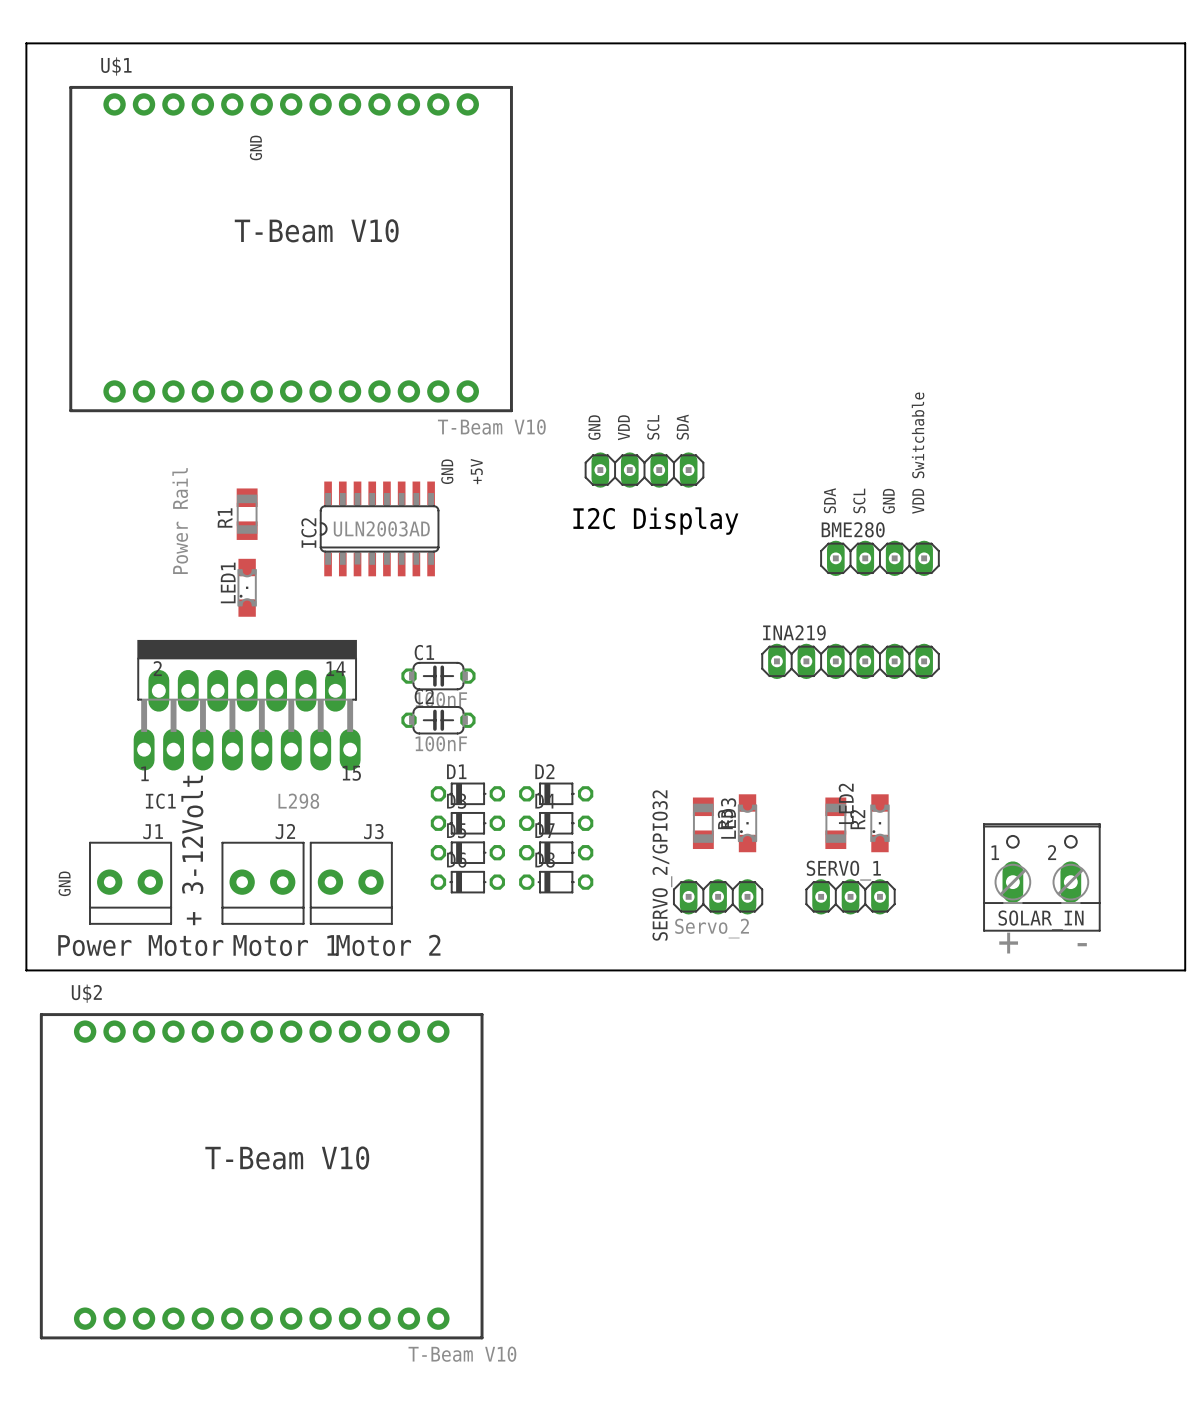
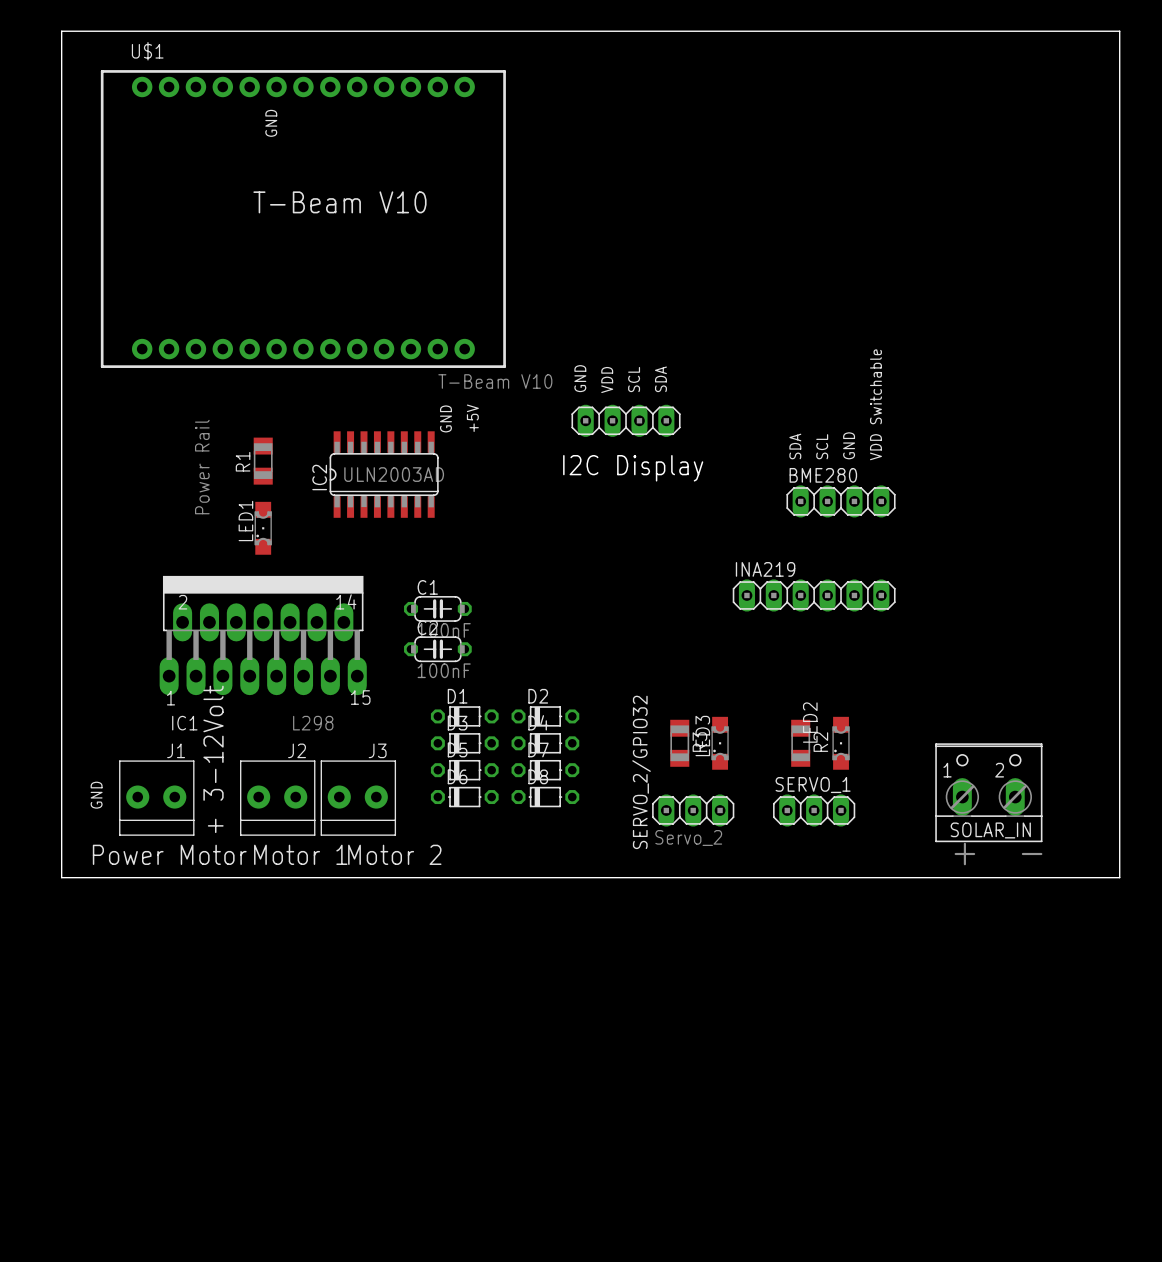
U$2: (261, 1176) -> none

